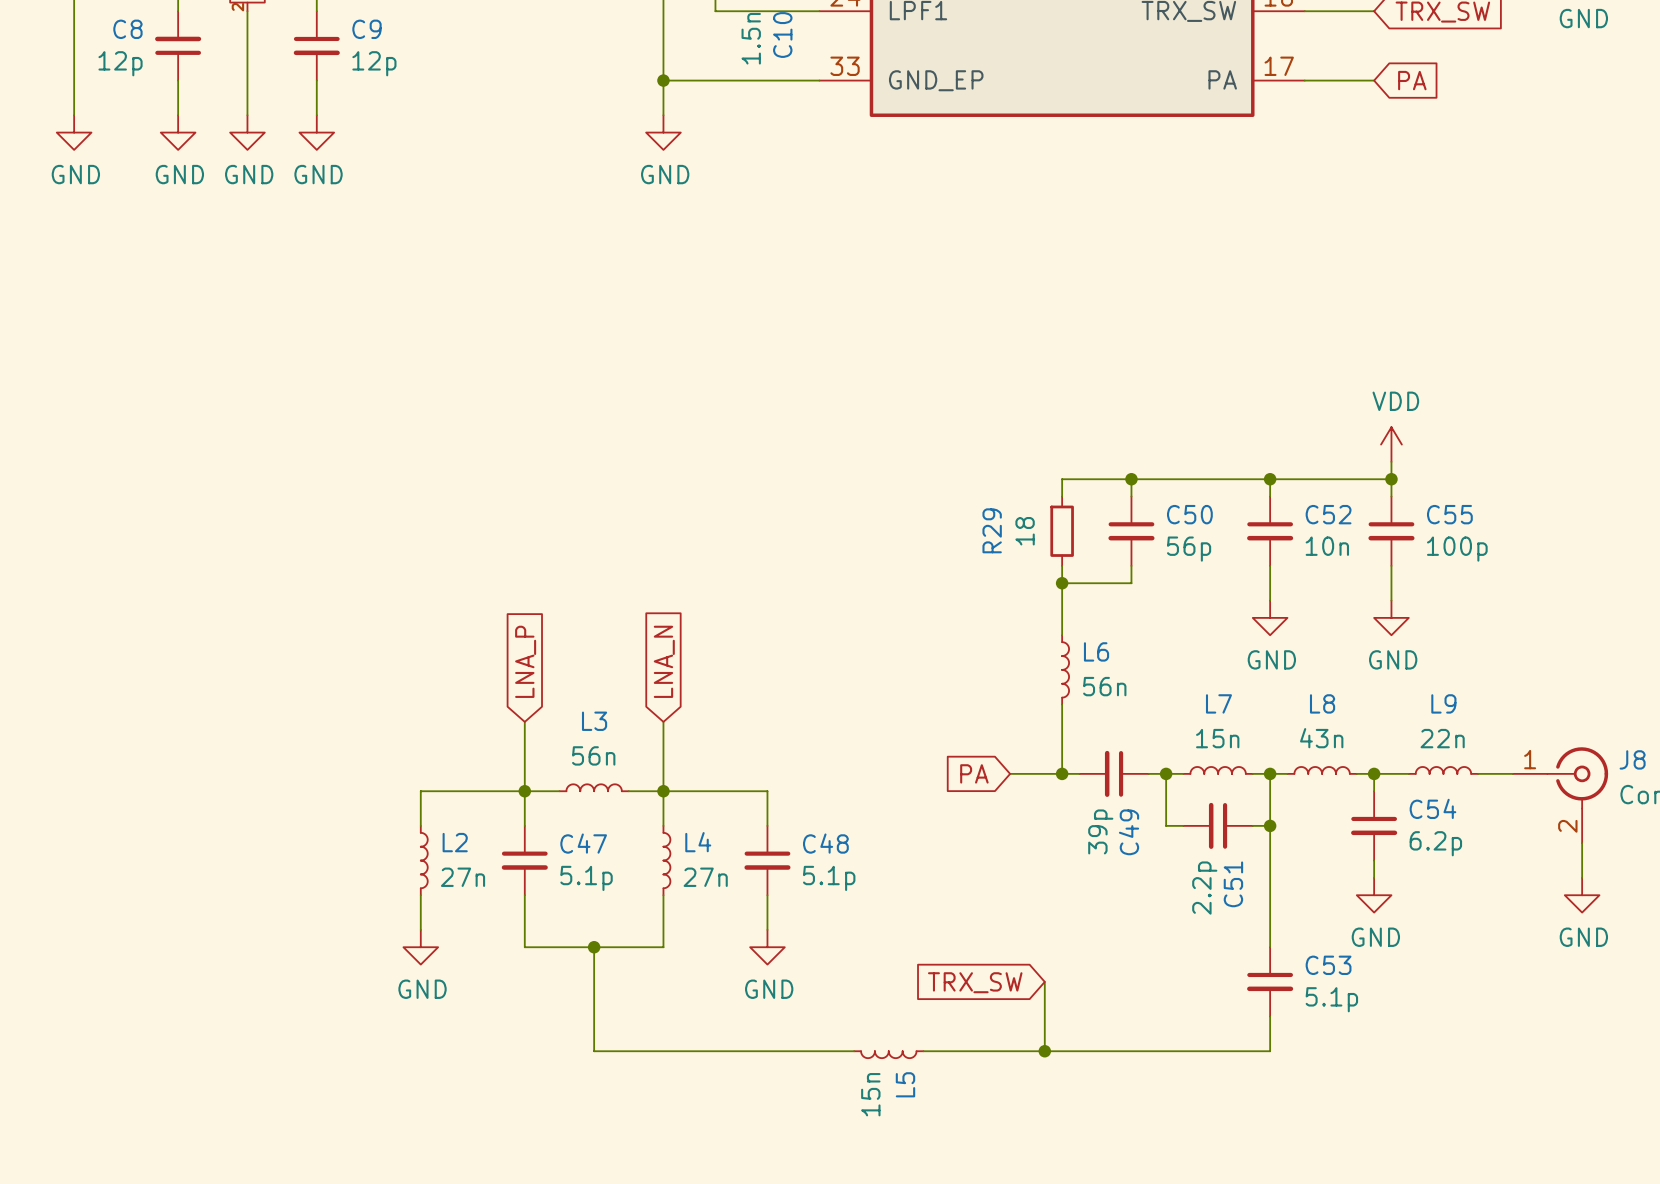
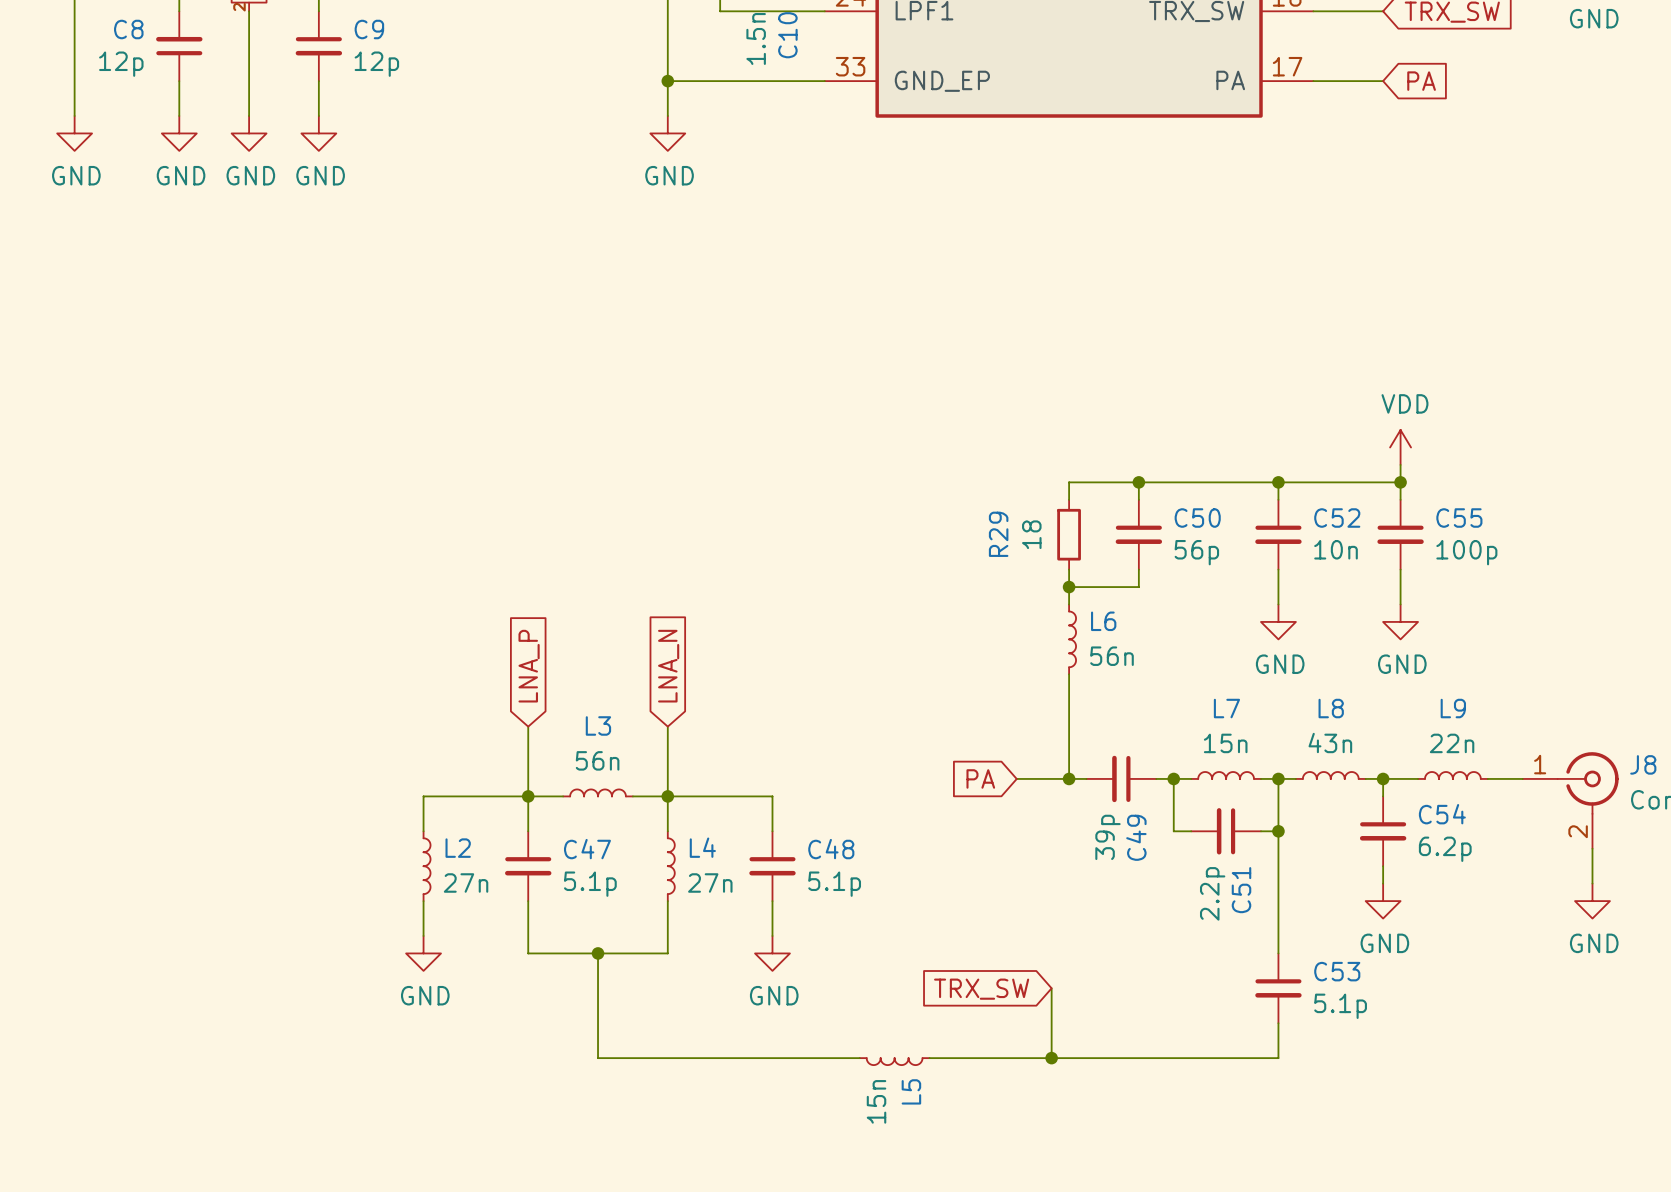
wire: (1062, 600) (1062, 635) -> (1069, 674) (1069, 709)
L6 position: (1065, 669) -> (1072, 639)

